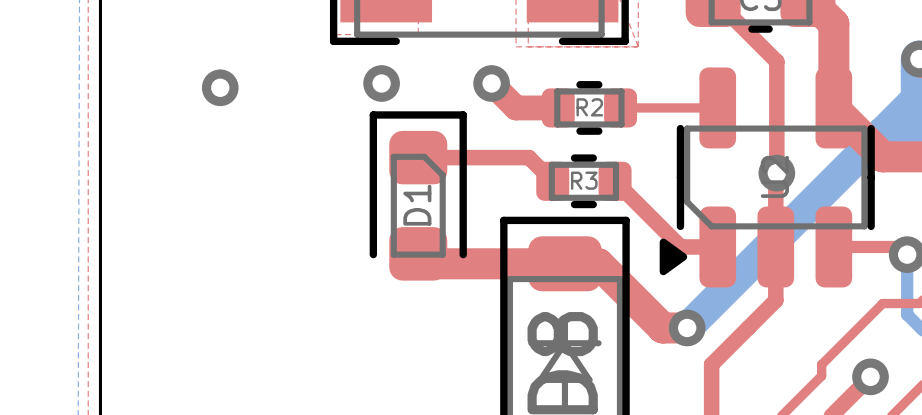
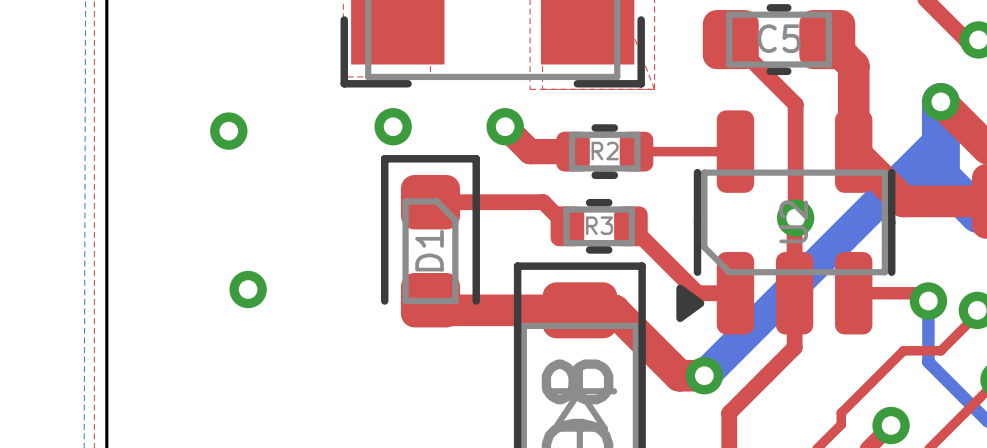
via: none -> (248, 289)

